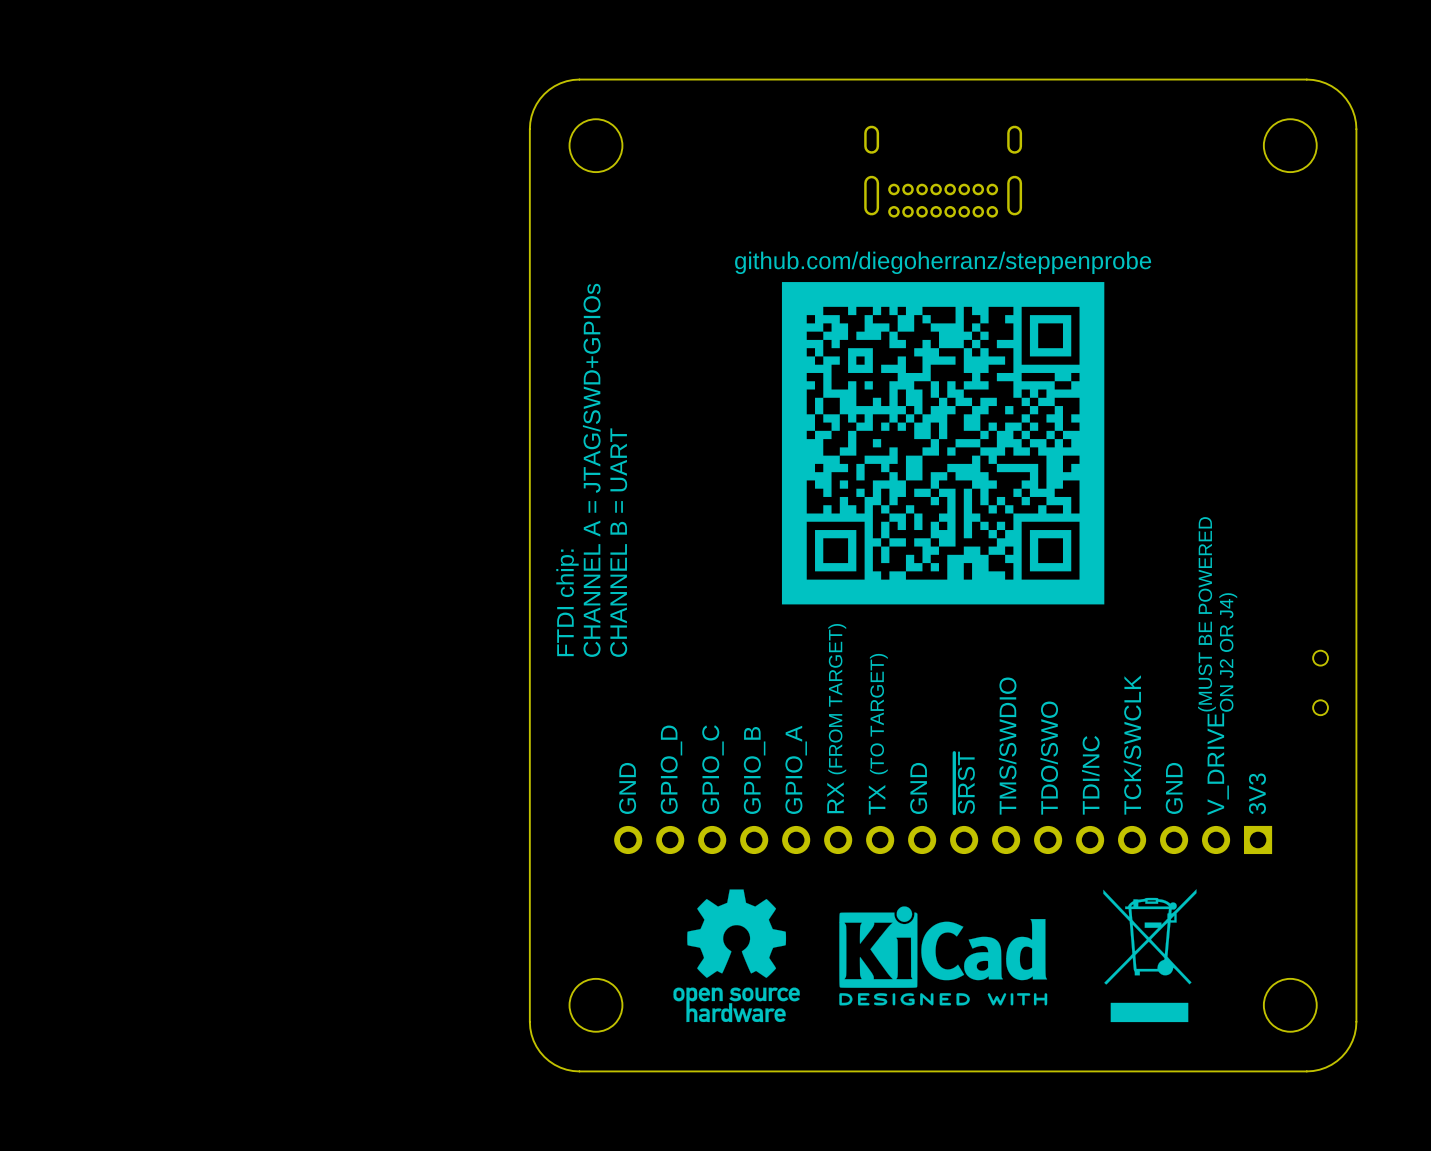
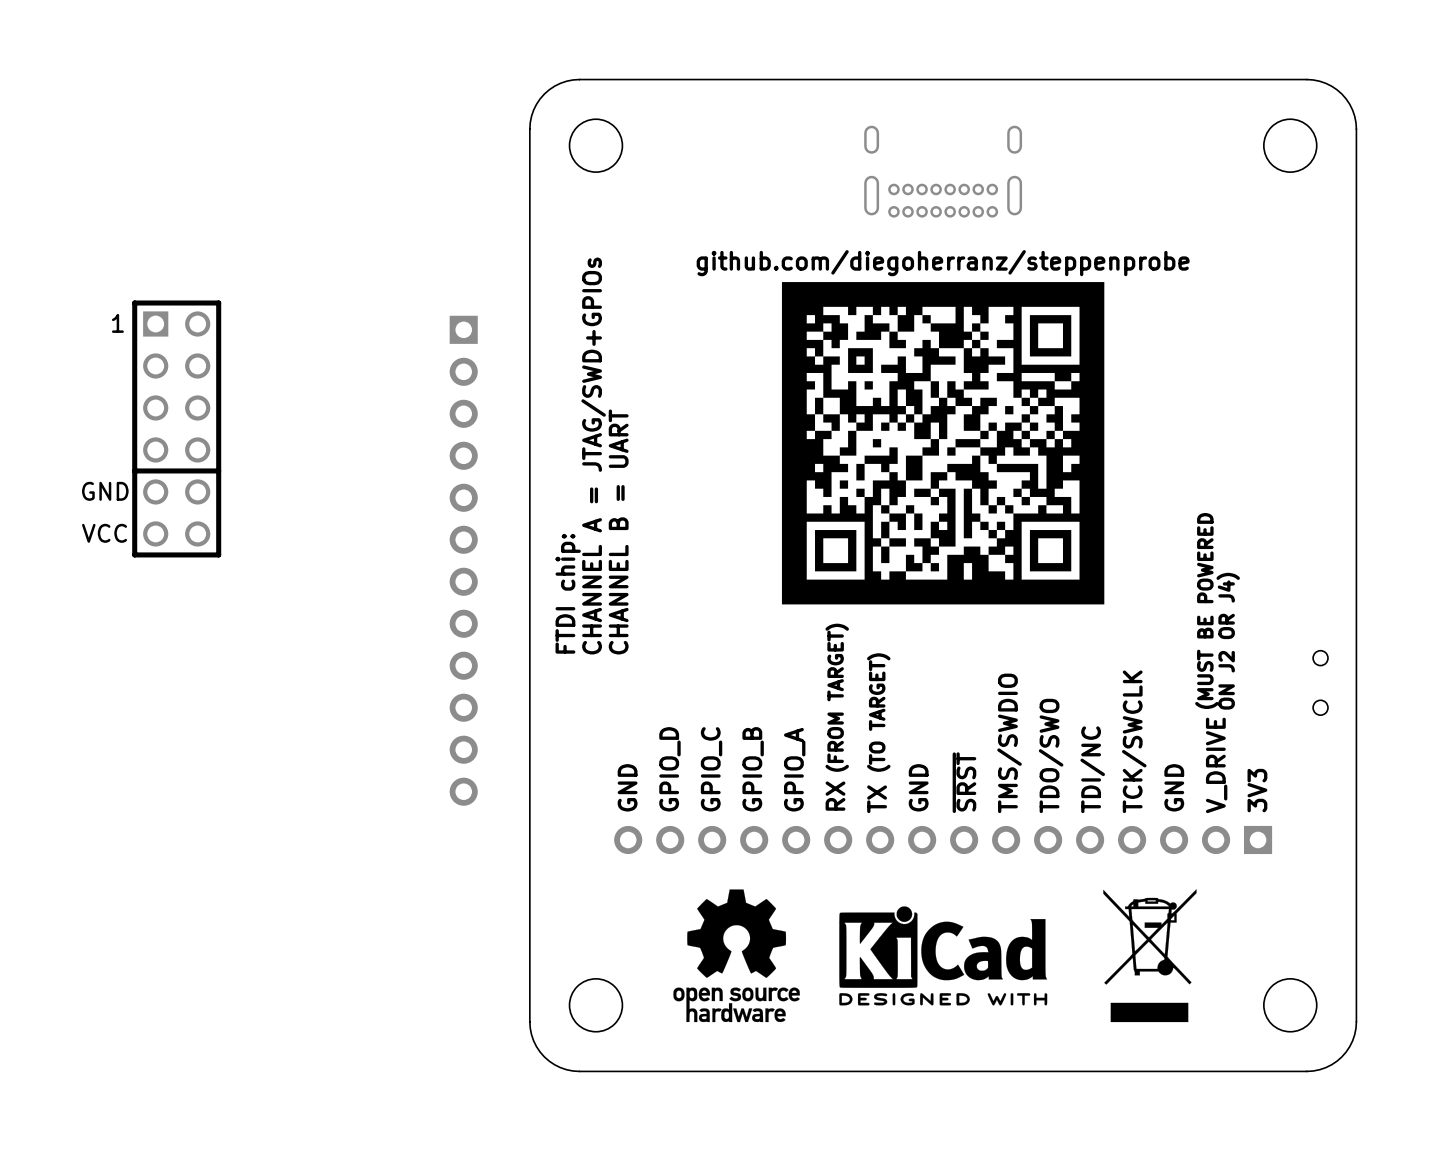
part: none -> (176, 428)
part: none -> (463, 560)

